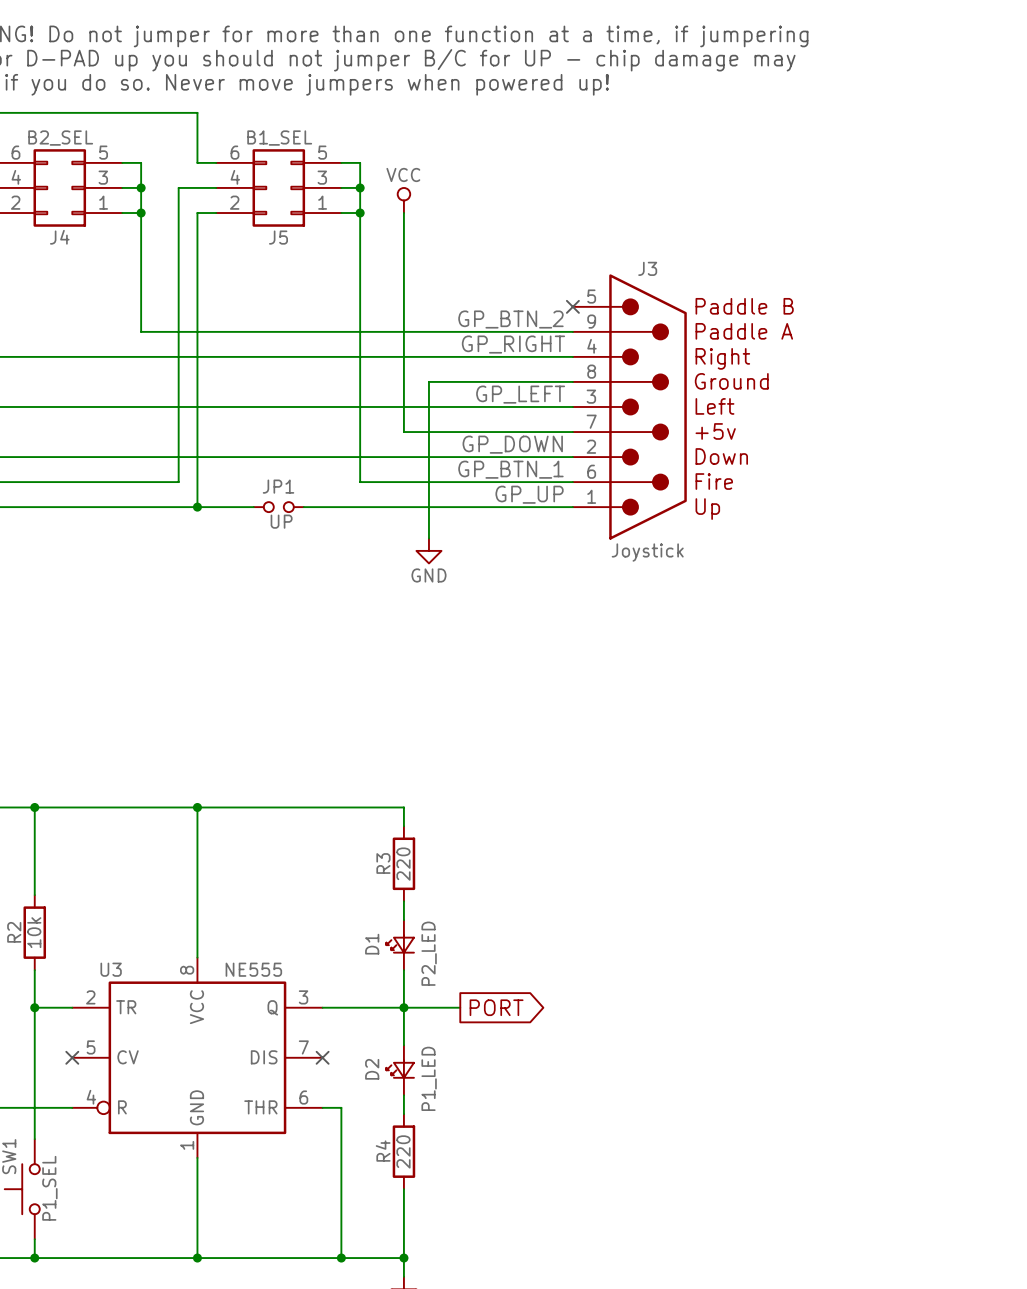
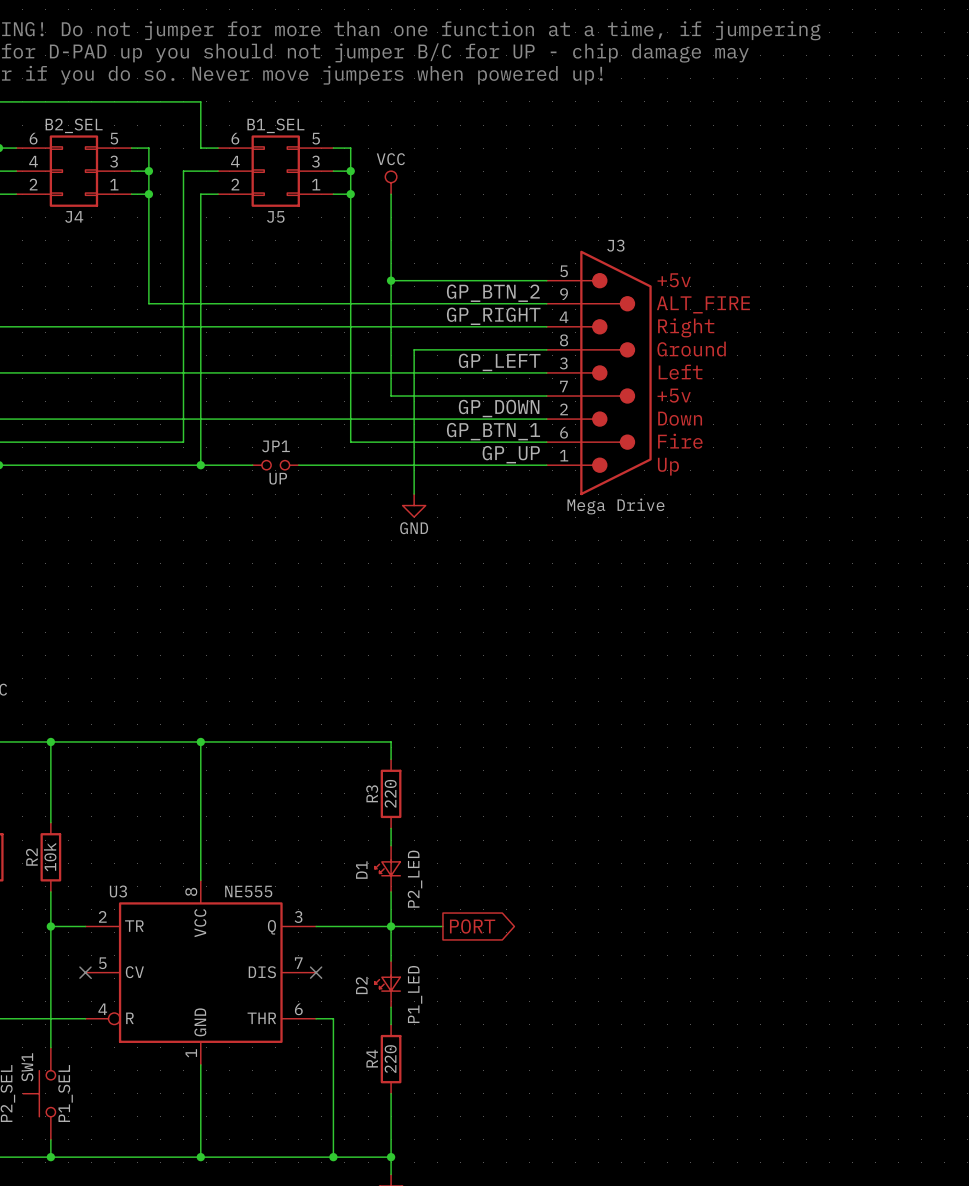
wire: none -> (391, 280) (546, 280)
junction: none -> (391, 280)
no-connect mark: (572, 306) -> none
J3 text: Paddle B (744, 306) -> +5v (674, 280)
J3 text: Paddle A (744, 331) -> ALT_FIRE (703, 304)
J3 value: Joystick (647, 552) -> Mega Drive (615, 506)

